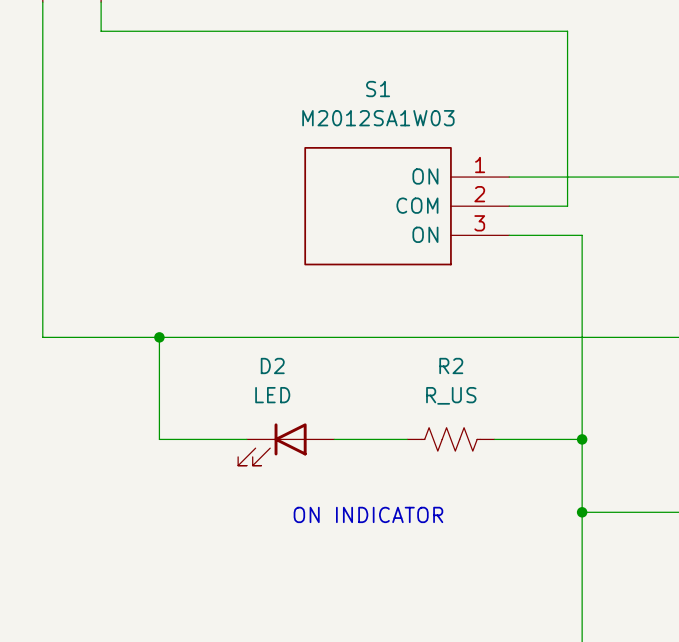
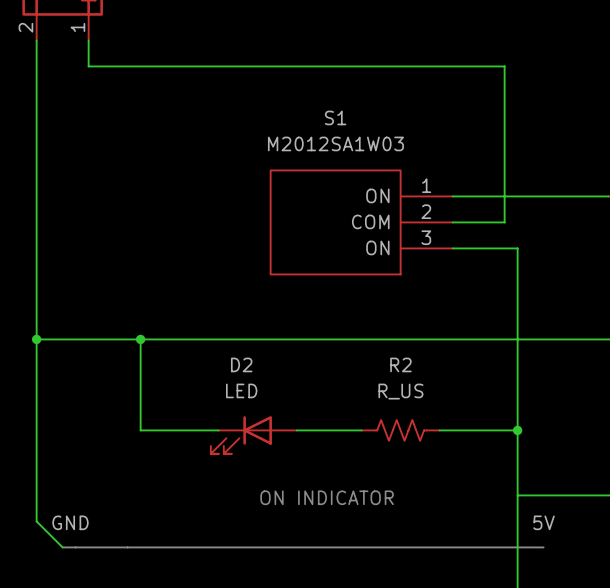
wire: none -> (36, 339) (36, 521) (62, 547)
junction: none -> (36, 339)
junction: (582, 512) -> none
label: none -> GND (70, 522)
label: none -> 5V (544, 522)
bus: none -> (62, 547) (543, 547)

